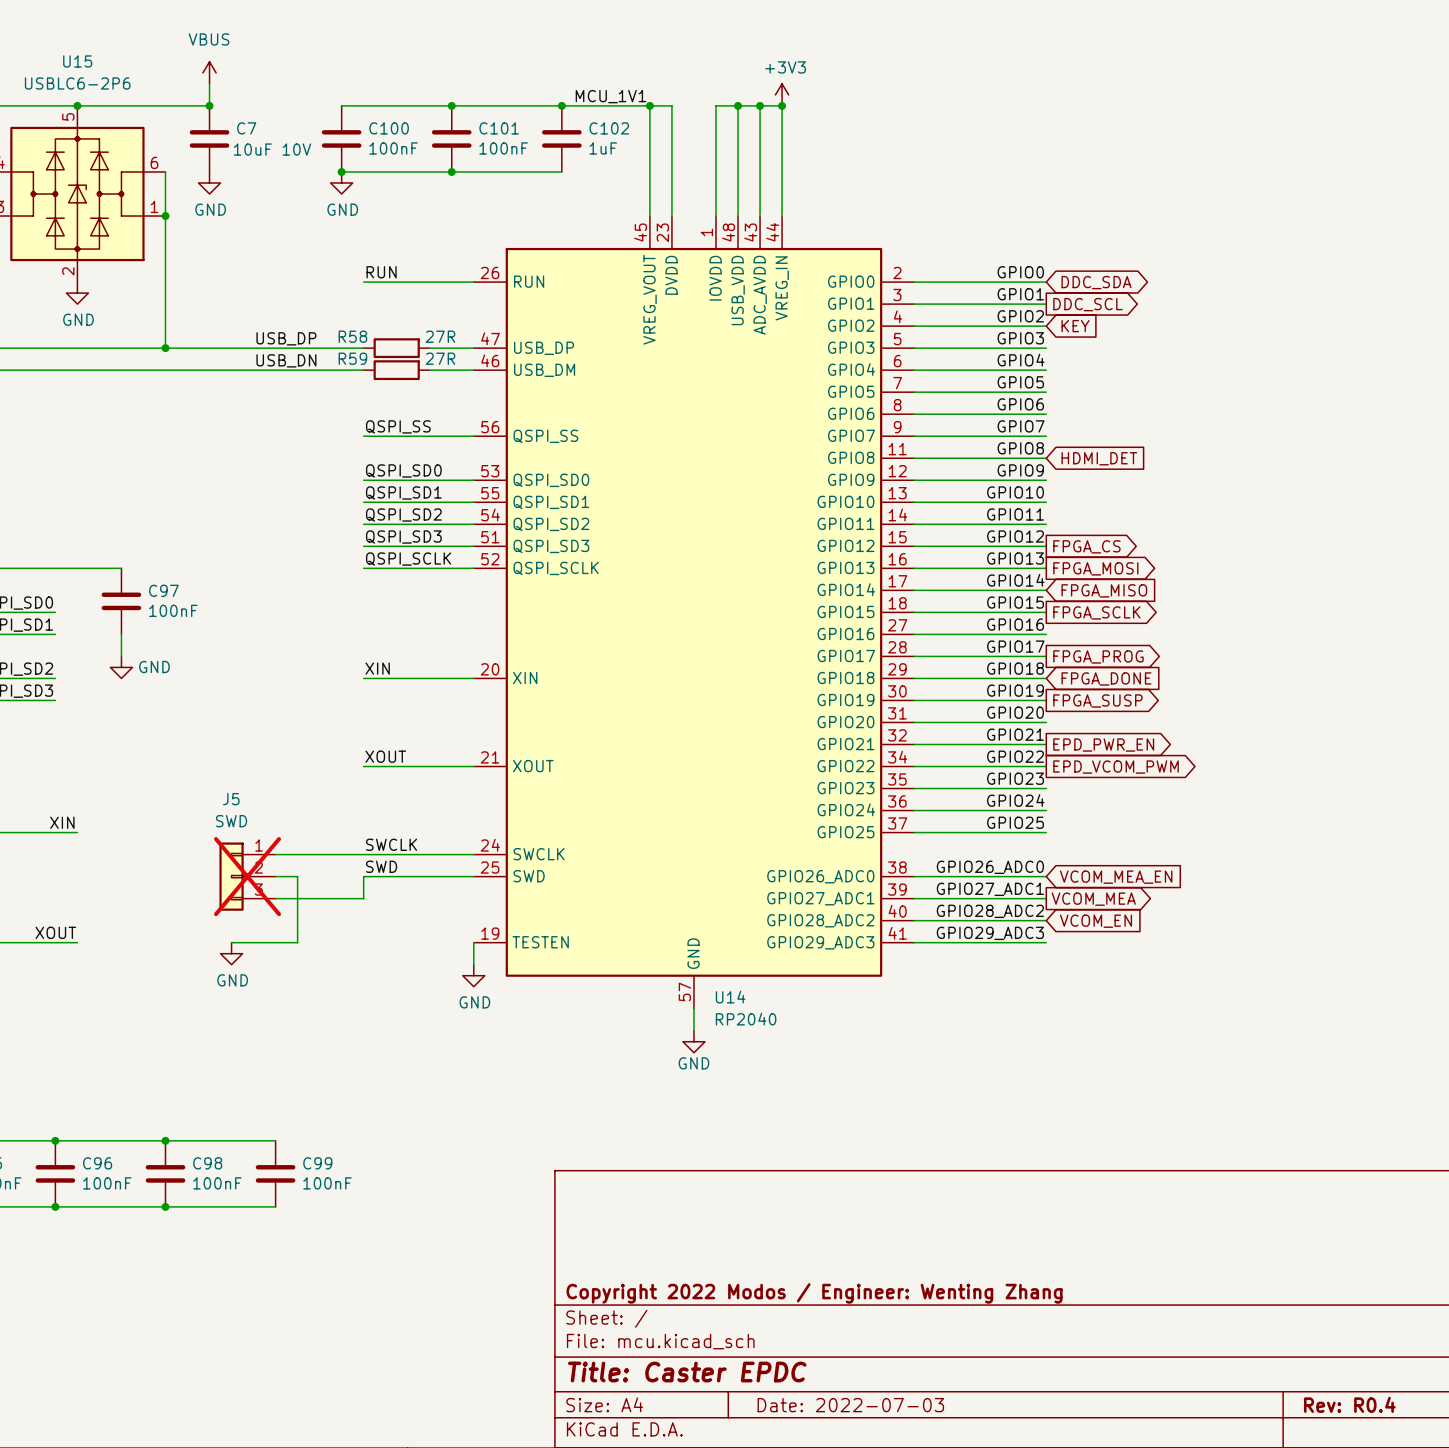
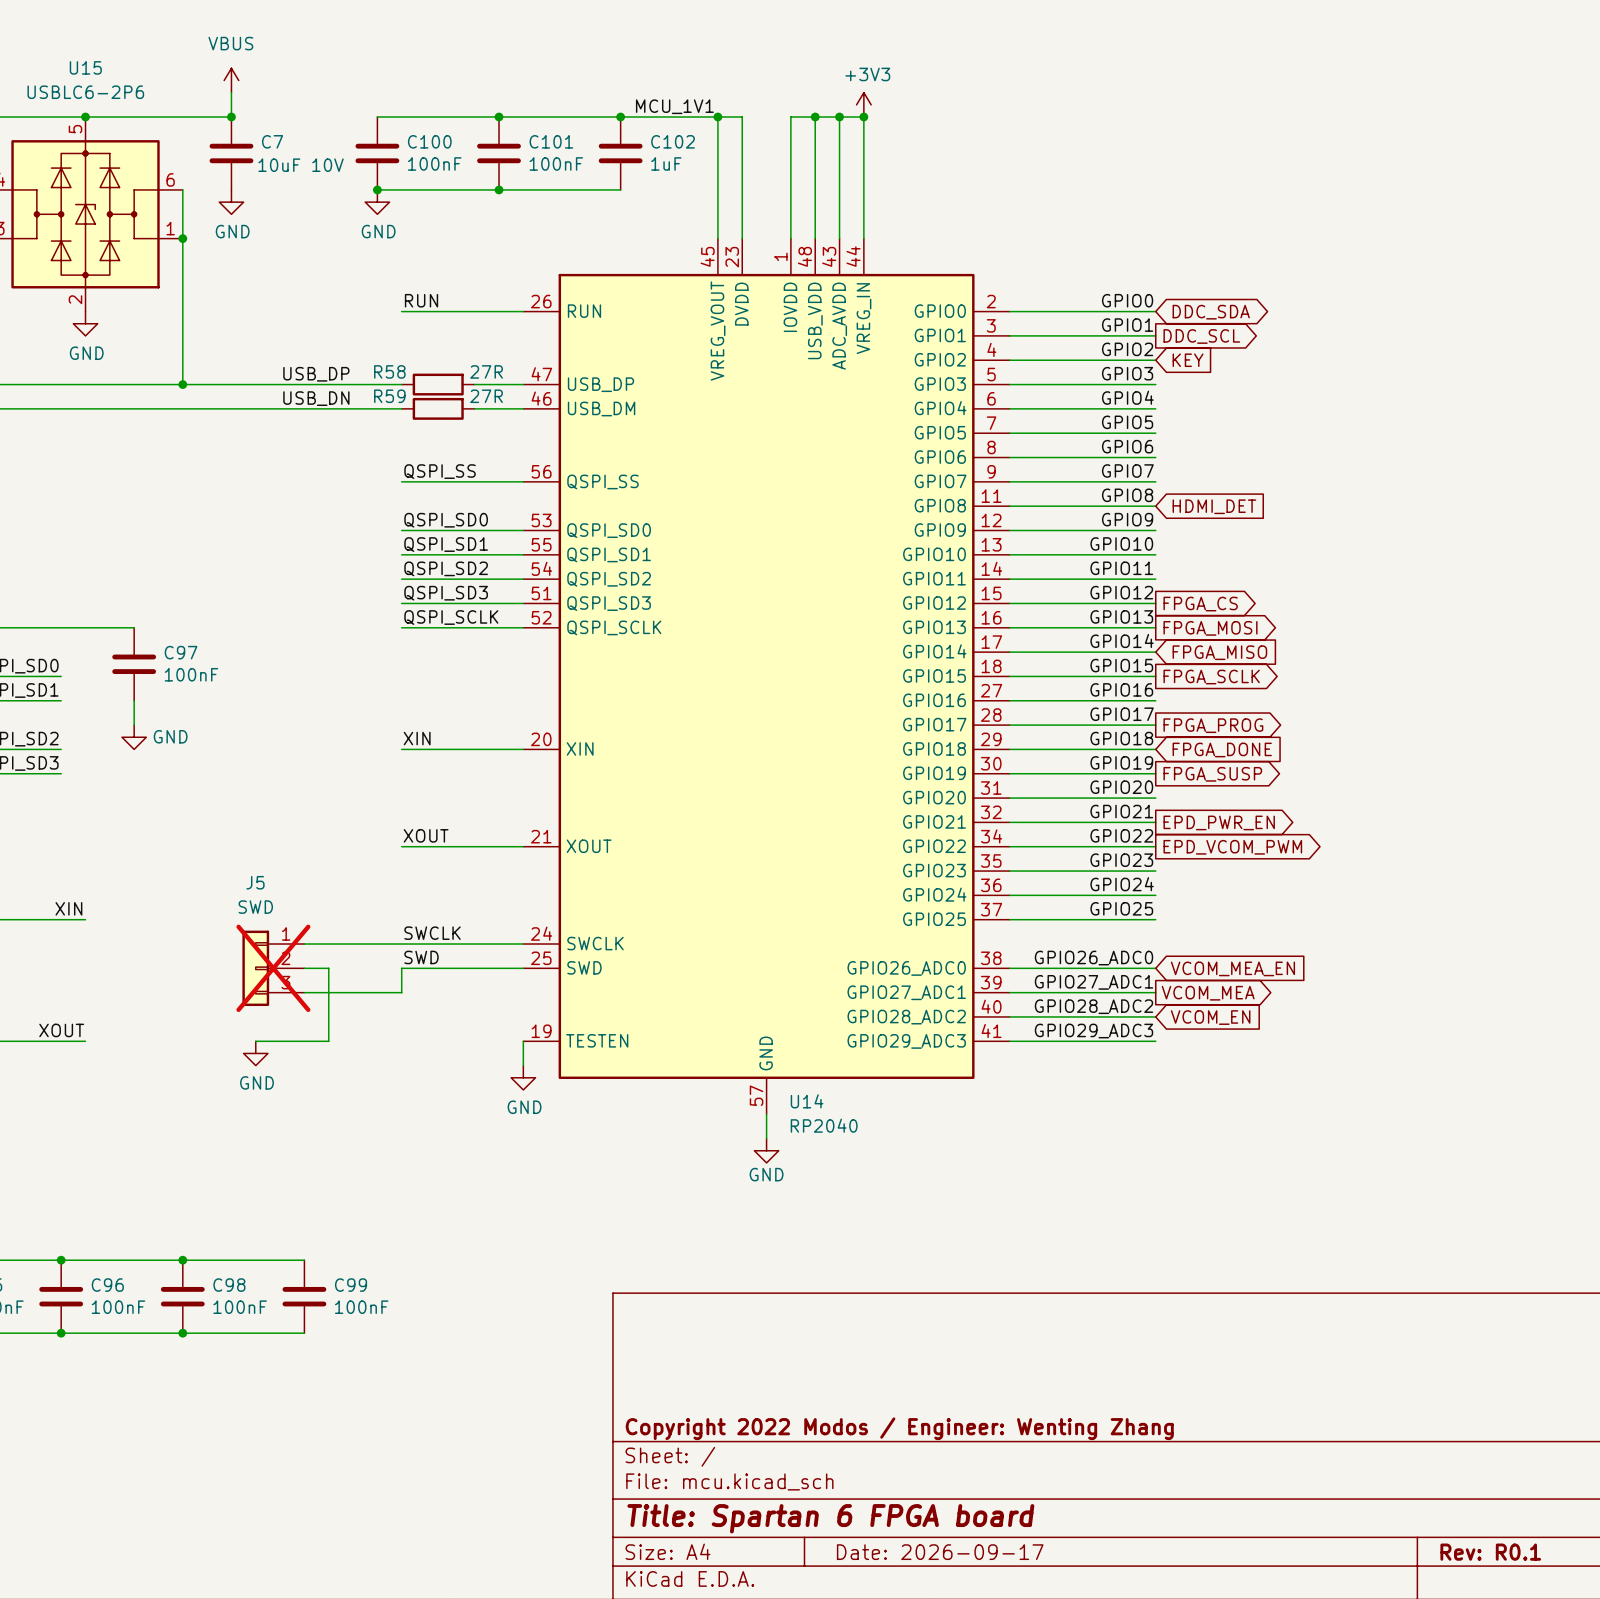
title block: Title: Caster EPDC (687, 1372) -> Title: Spartan 6 FPGA board (830, 1518)
title block: Rev: R0.4 (1349, 1404) -> Rev: R0.1 (1490, 1552)
title block: Date: 2022-07-03 (850, 1405) -> Date: 2026-09-17 (940, 1552)

